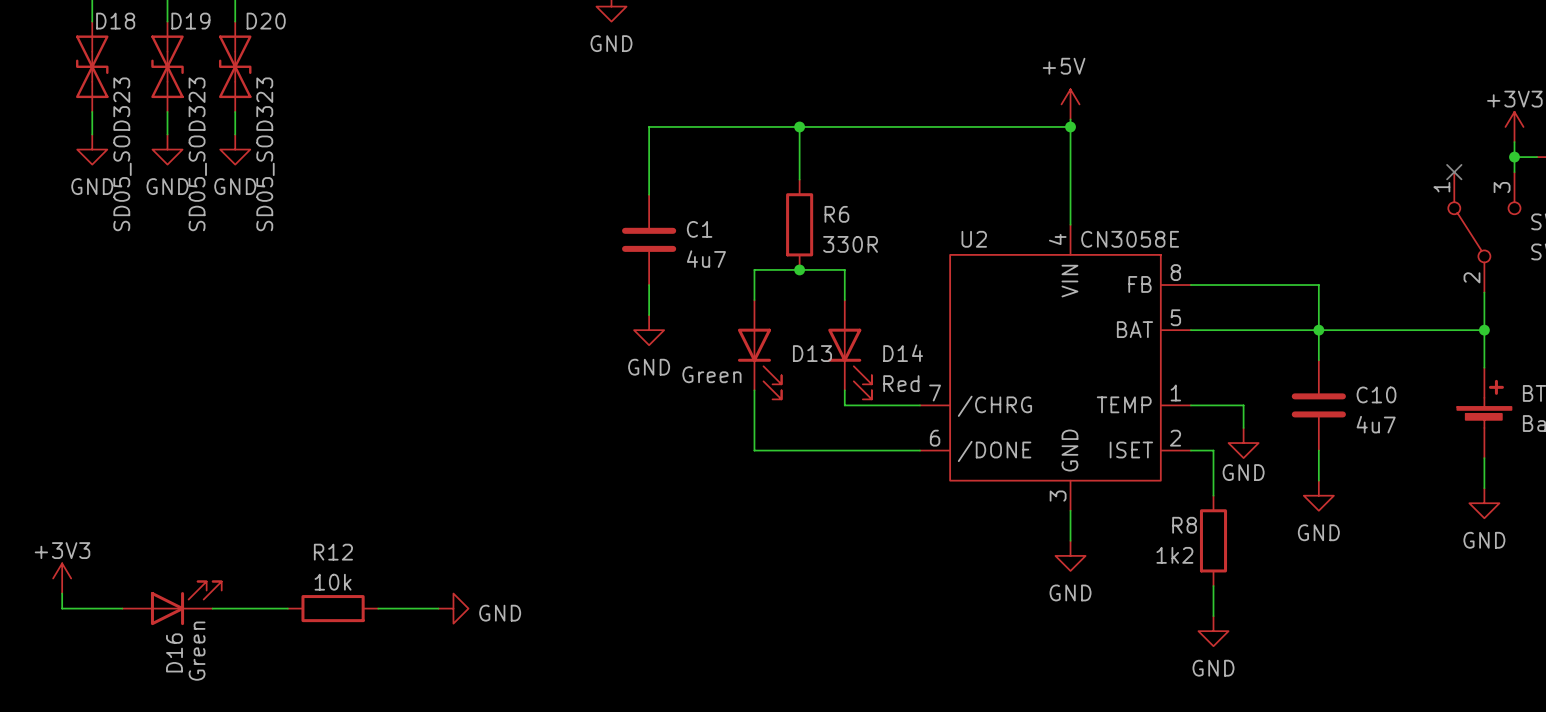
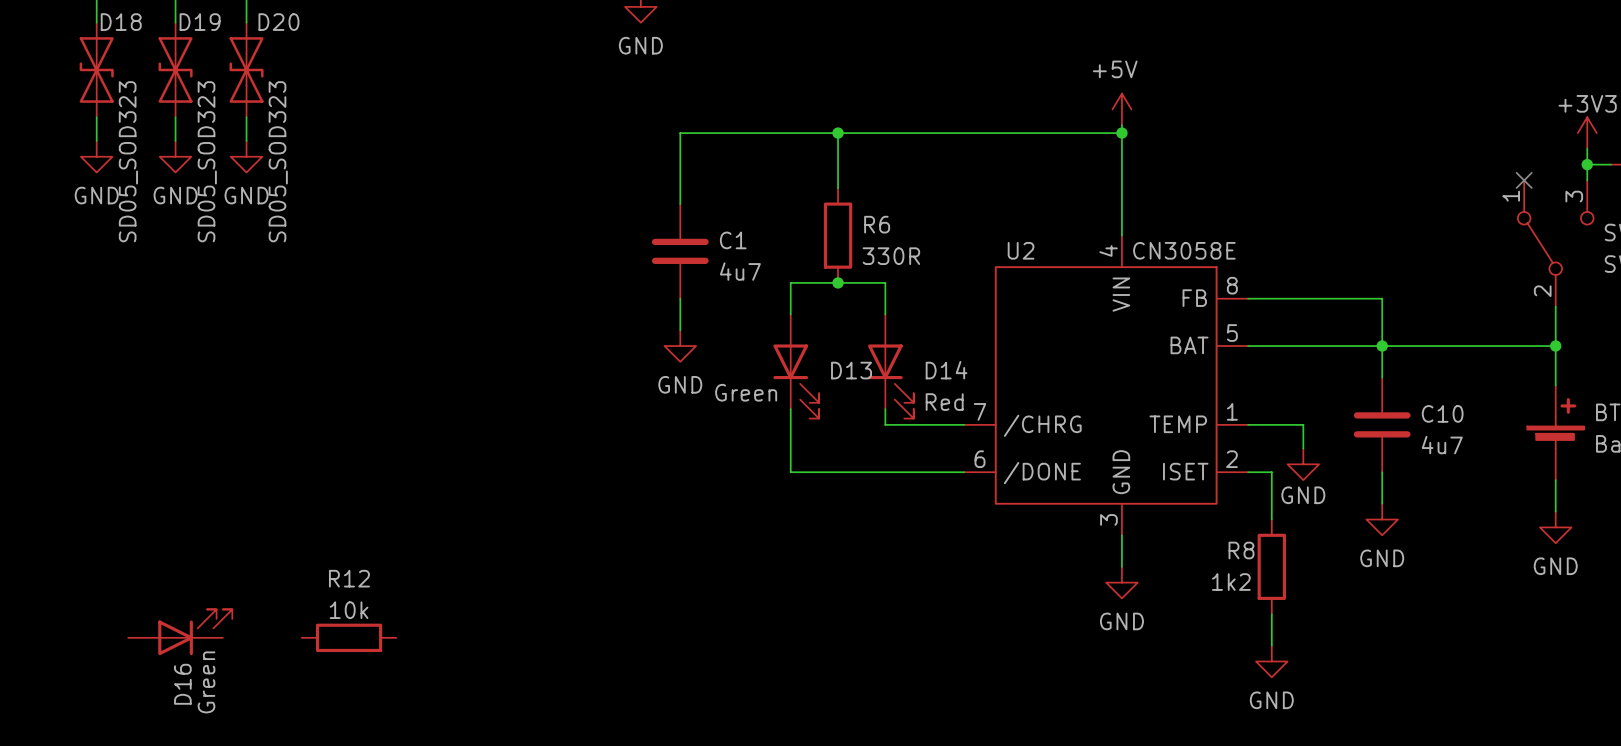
power symbol: +3V3 (62, 578) -> none
wire: (62, 593) (62, 608) (122, 608) -> none
wire: (212, 608) (287, 608) -> none
wire: (378, 608) (438, 608) -> none
power symbol: GND (453, 608) -> none

